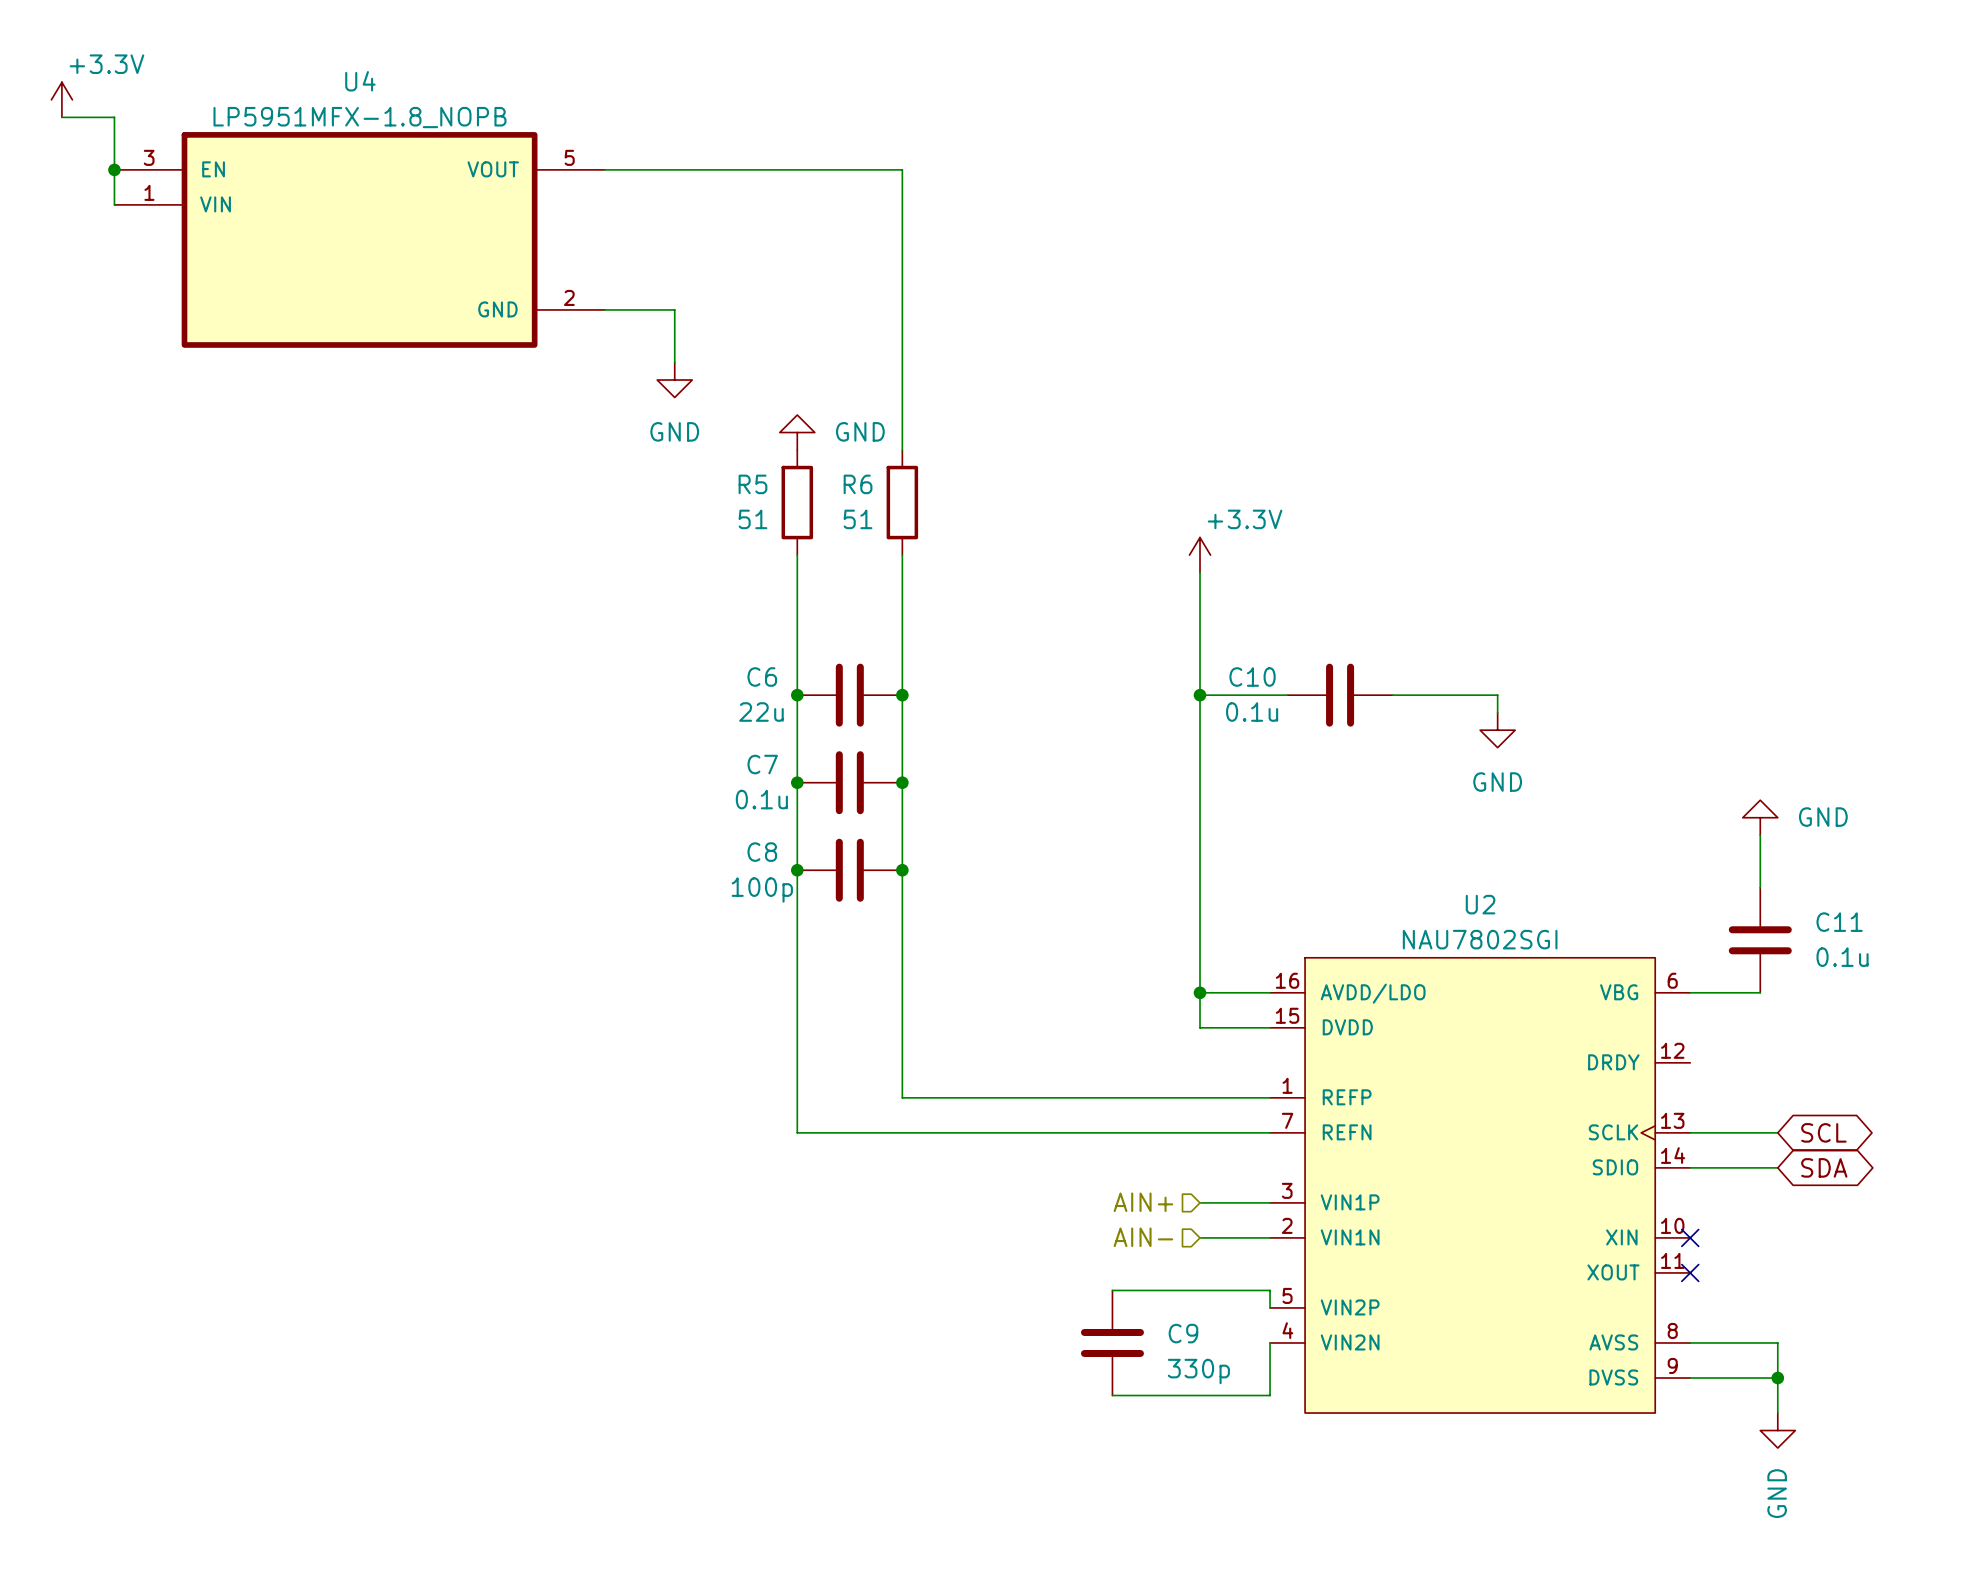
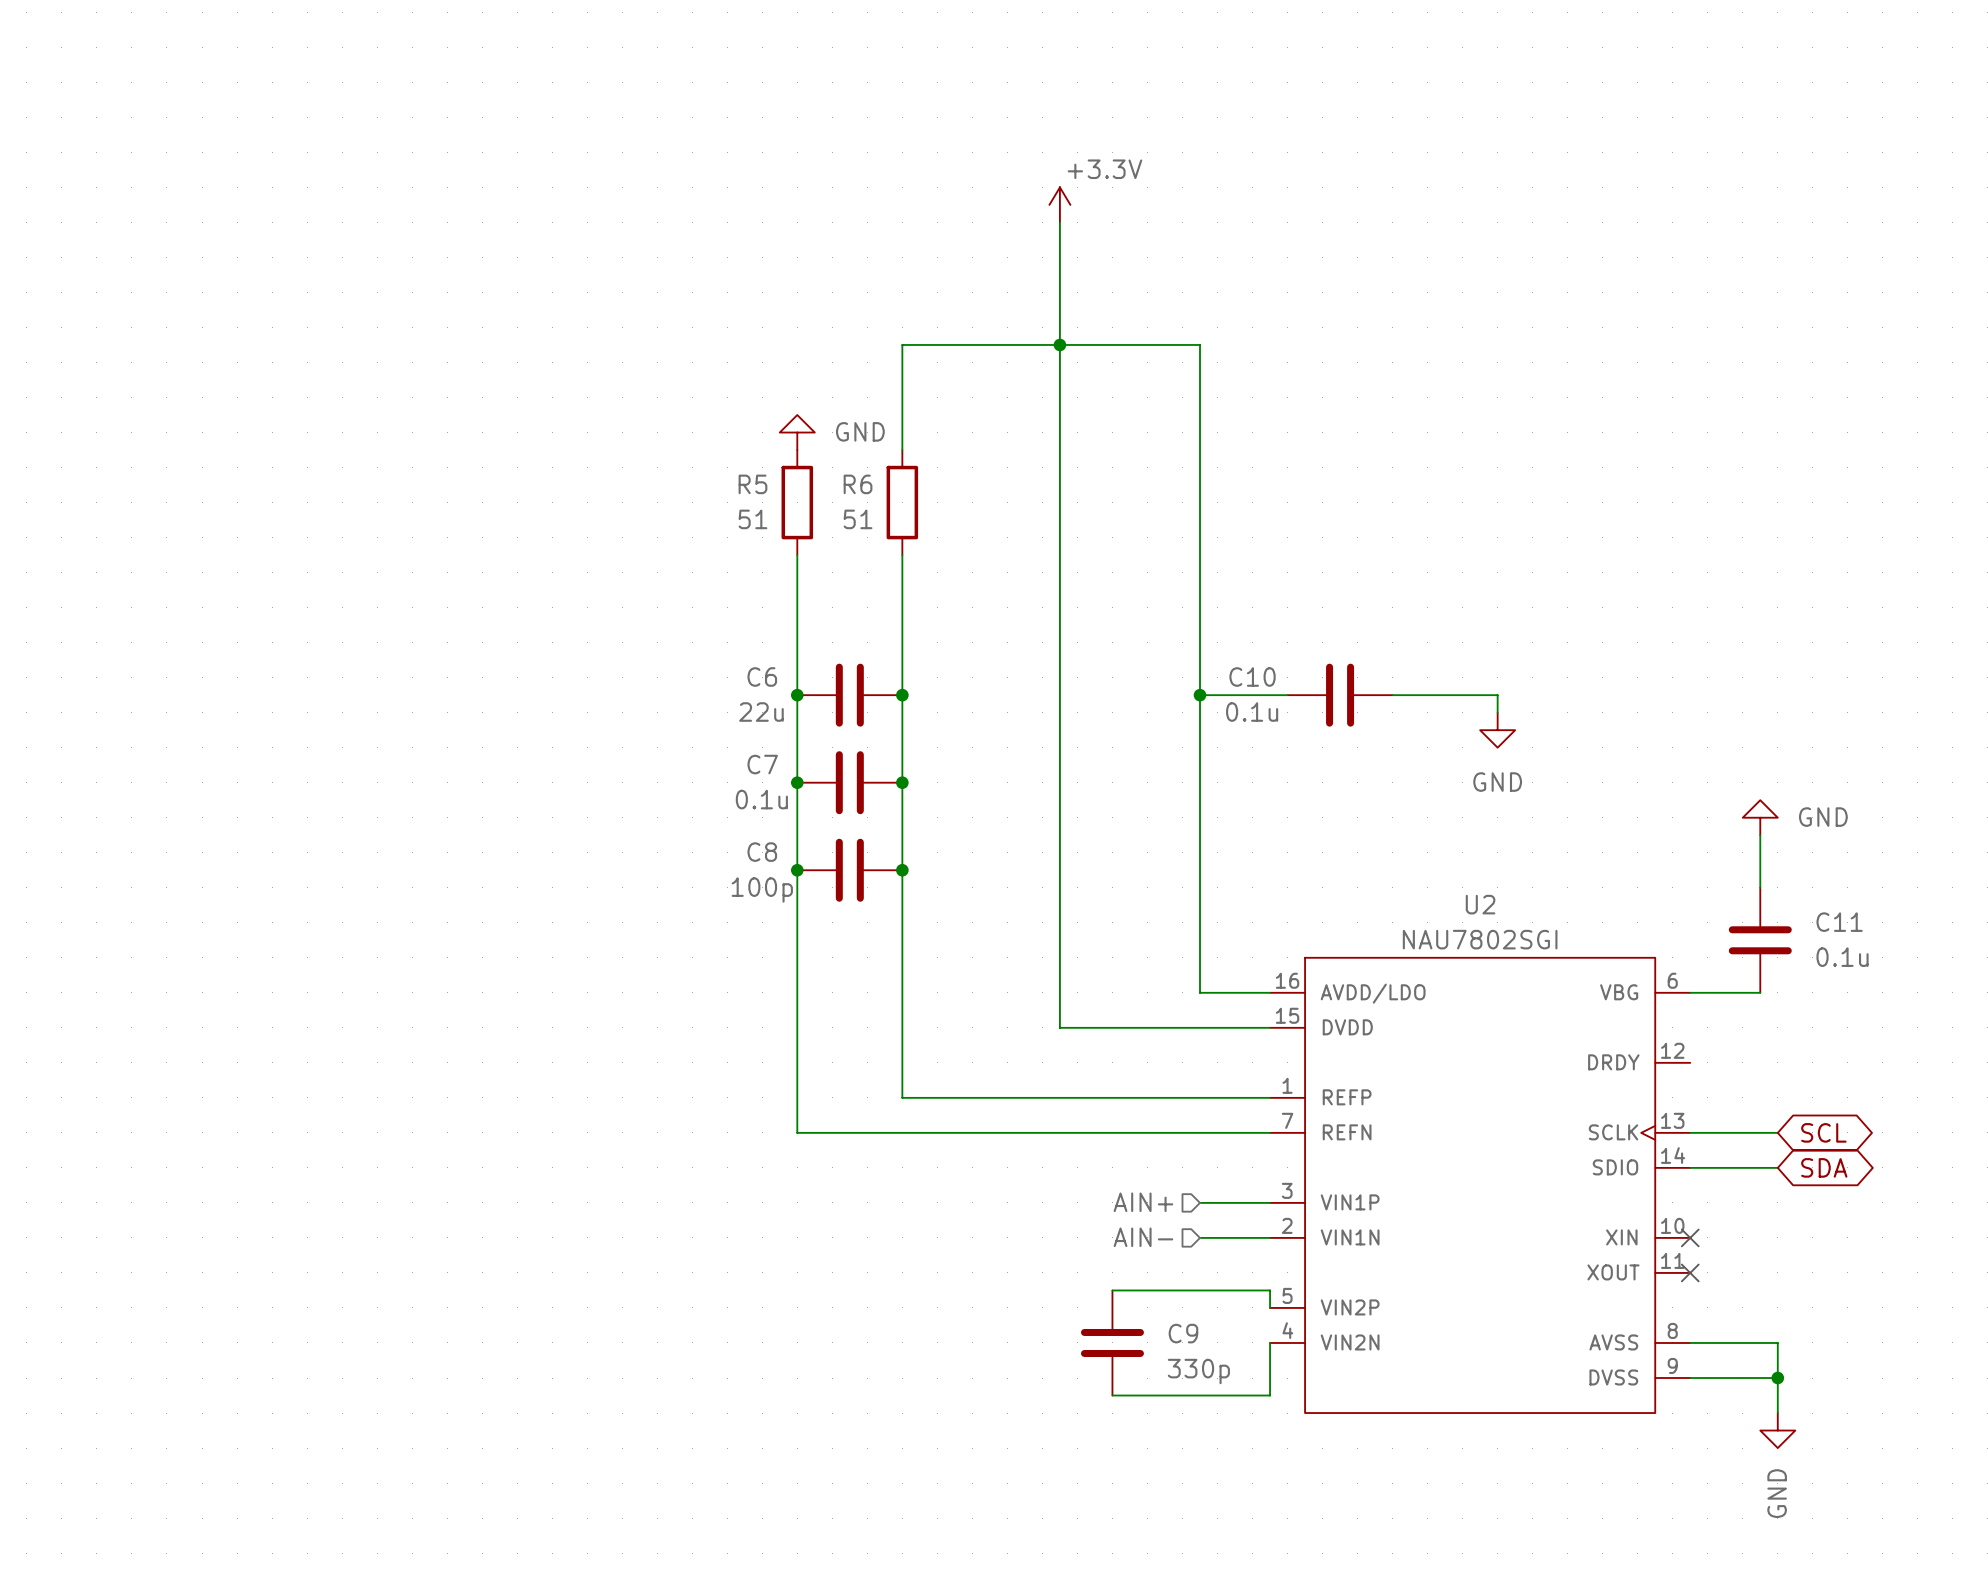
power symbol: +3.3V (61, 99) -> none
wire: (61, 117) (114, 117) (114, 204) -> none
junction: (114, 169) -> none
wire: (604, 169) (902, 169) (902, 344) -> (1200, 572) (1200, 344) (902, 344)
power symbol: none -> +3.3V (1059, 204)
U4: LP5951MFX-1.8_NOPB (359, 239) -> none
wire: (604, 309) (674, 309) (674, 362) -> none
junction: none -> (1059, 344)
power symbol: GND (674, 380) -> none
power symbol: +3.3V (1200, 555) -> none
wire: (1200, 992) (1200, 1027) -> (1059, 222) (1059, 1027) (1200, 1027)
junction: (1200, 992) -> none

